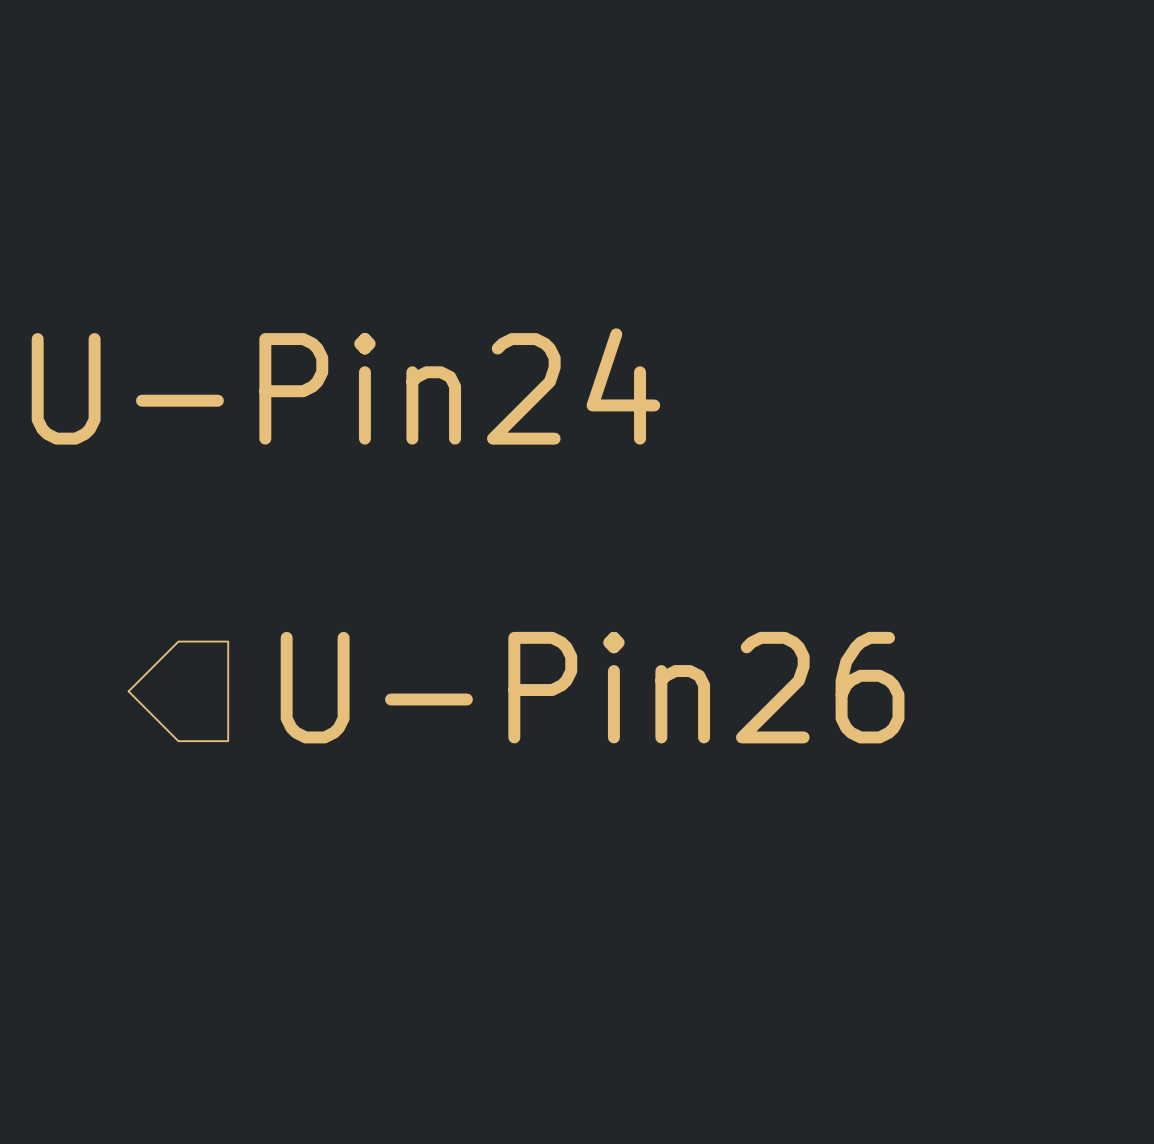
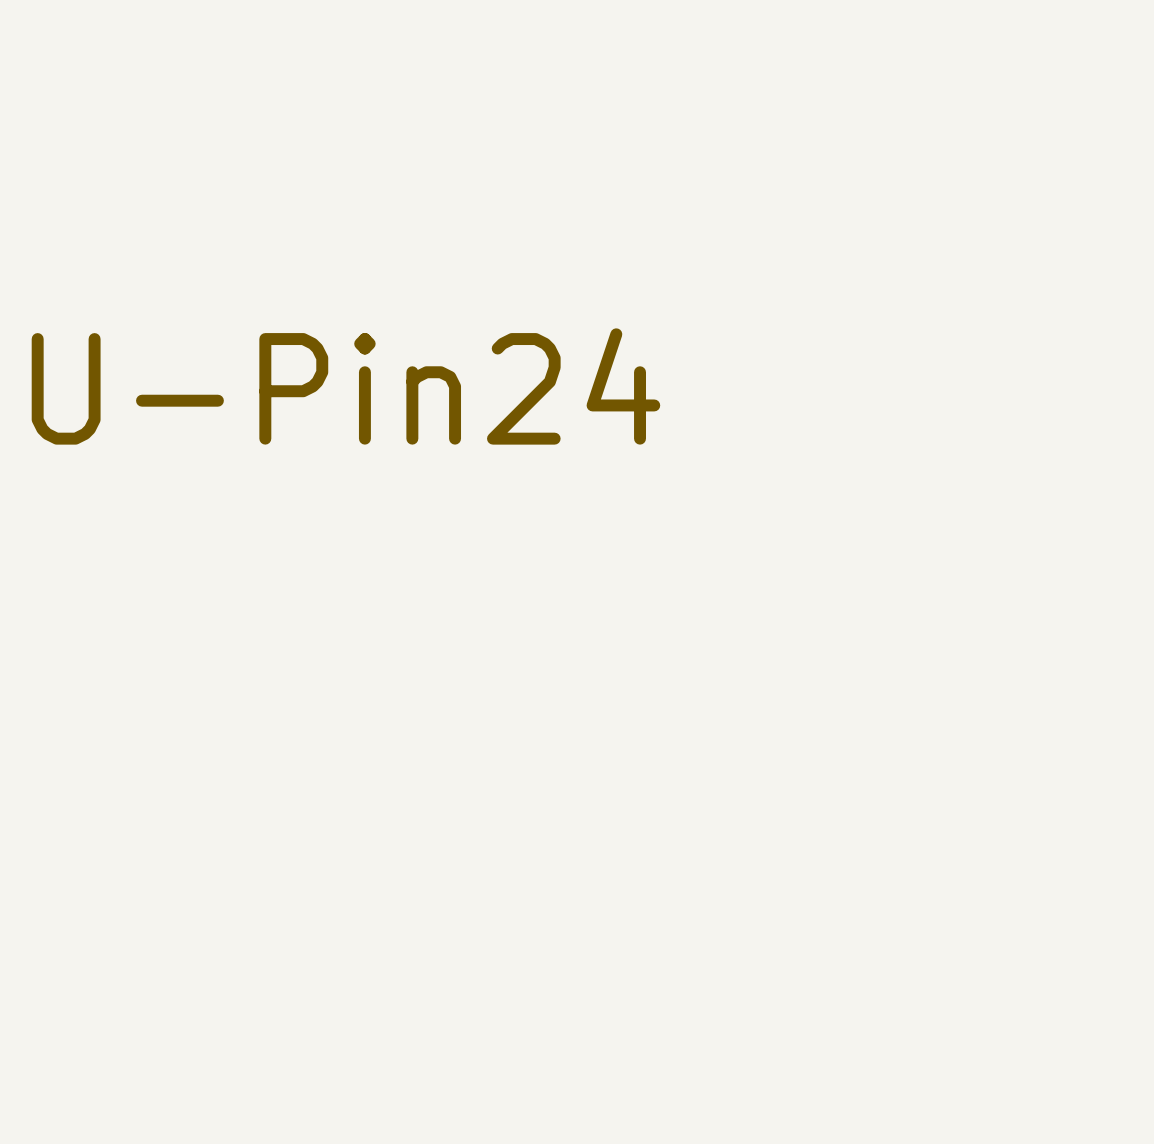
hierarchical label: U-Pin26 (592, 687) -> none

